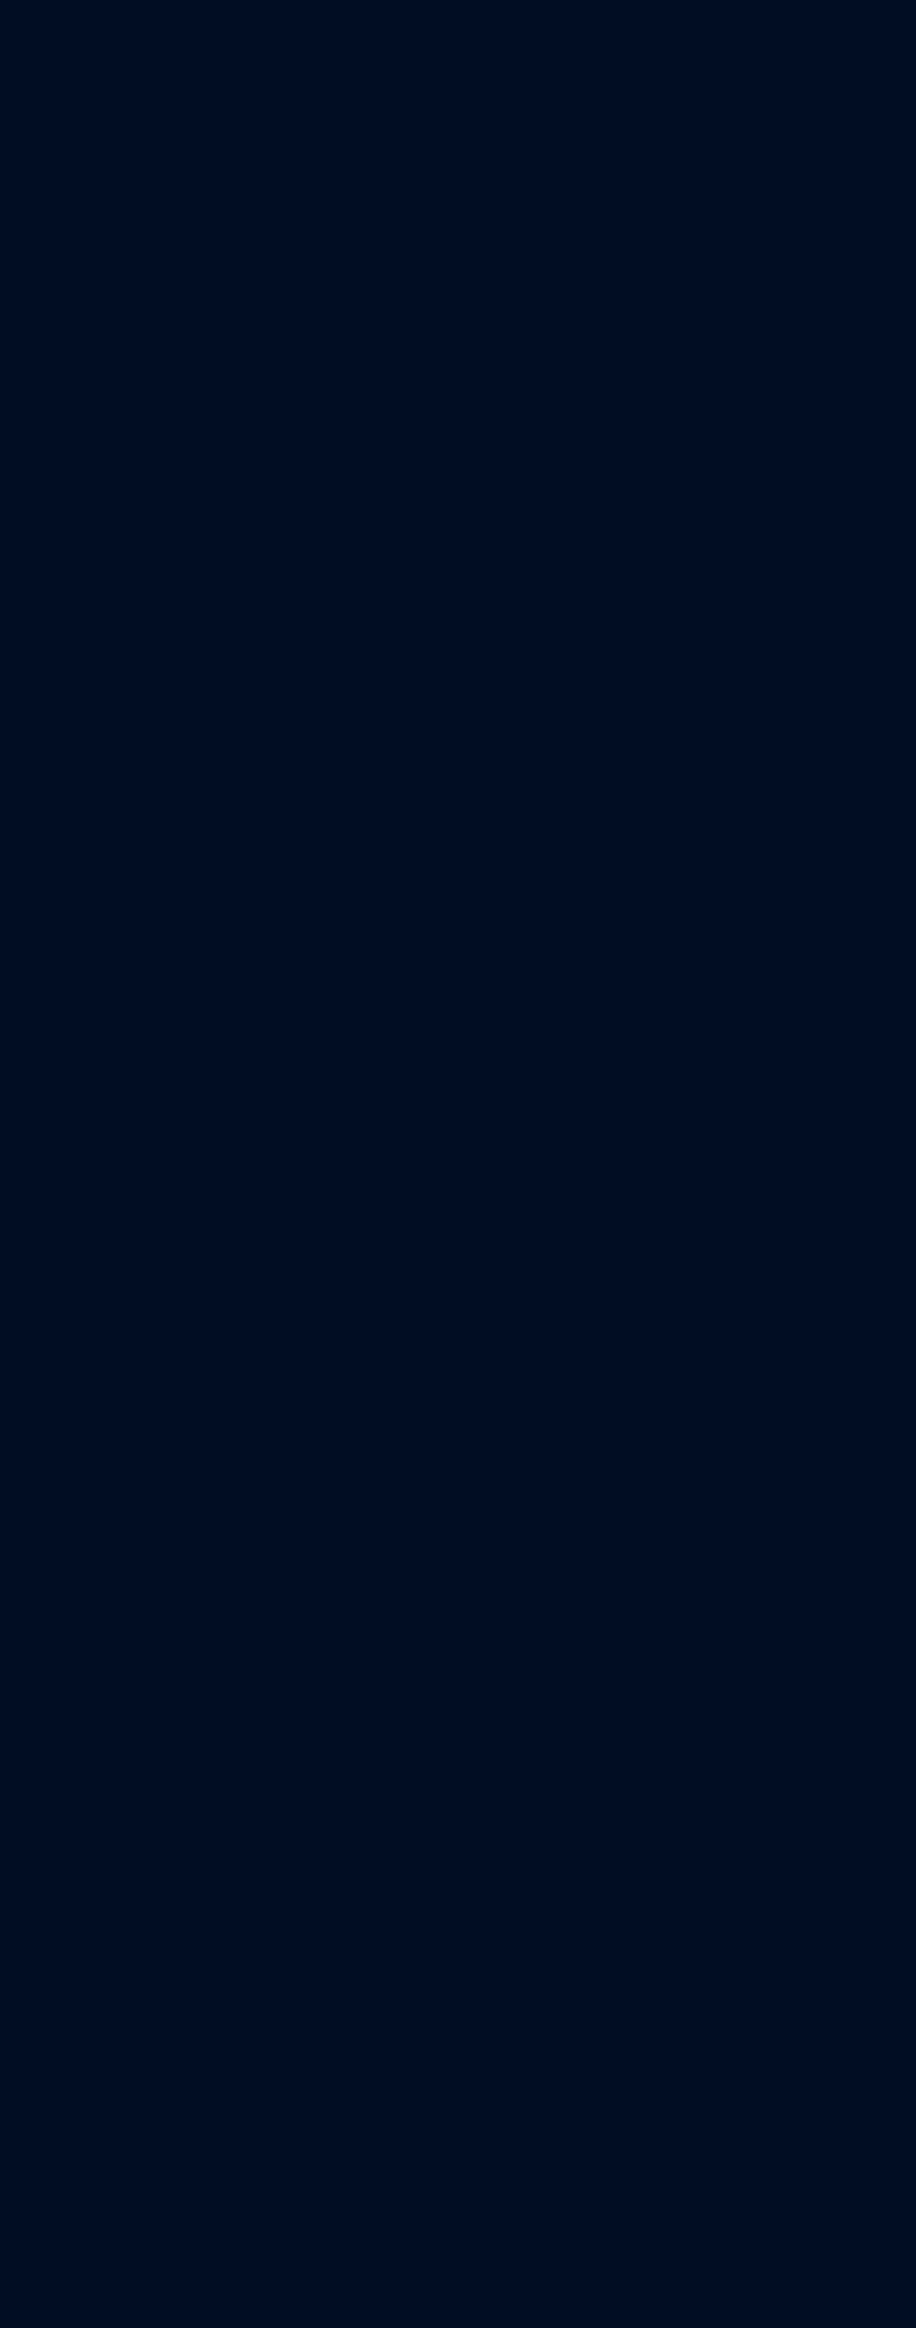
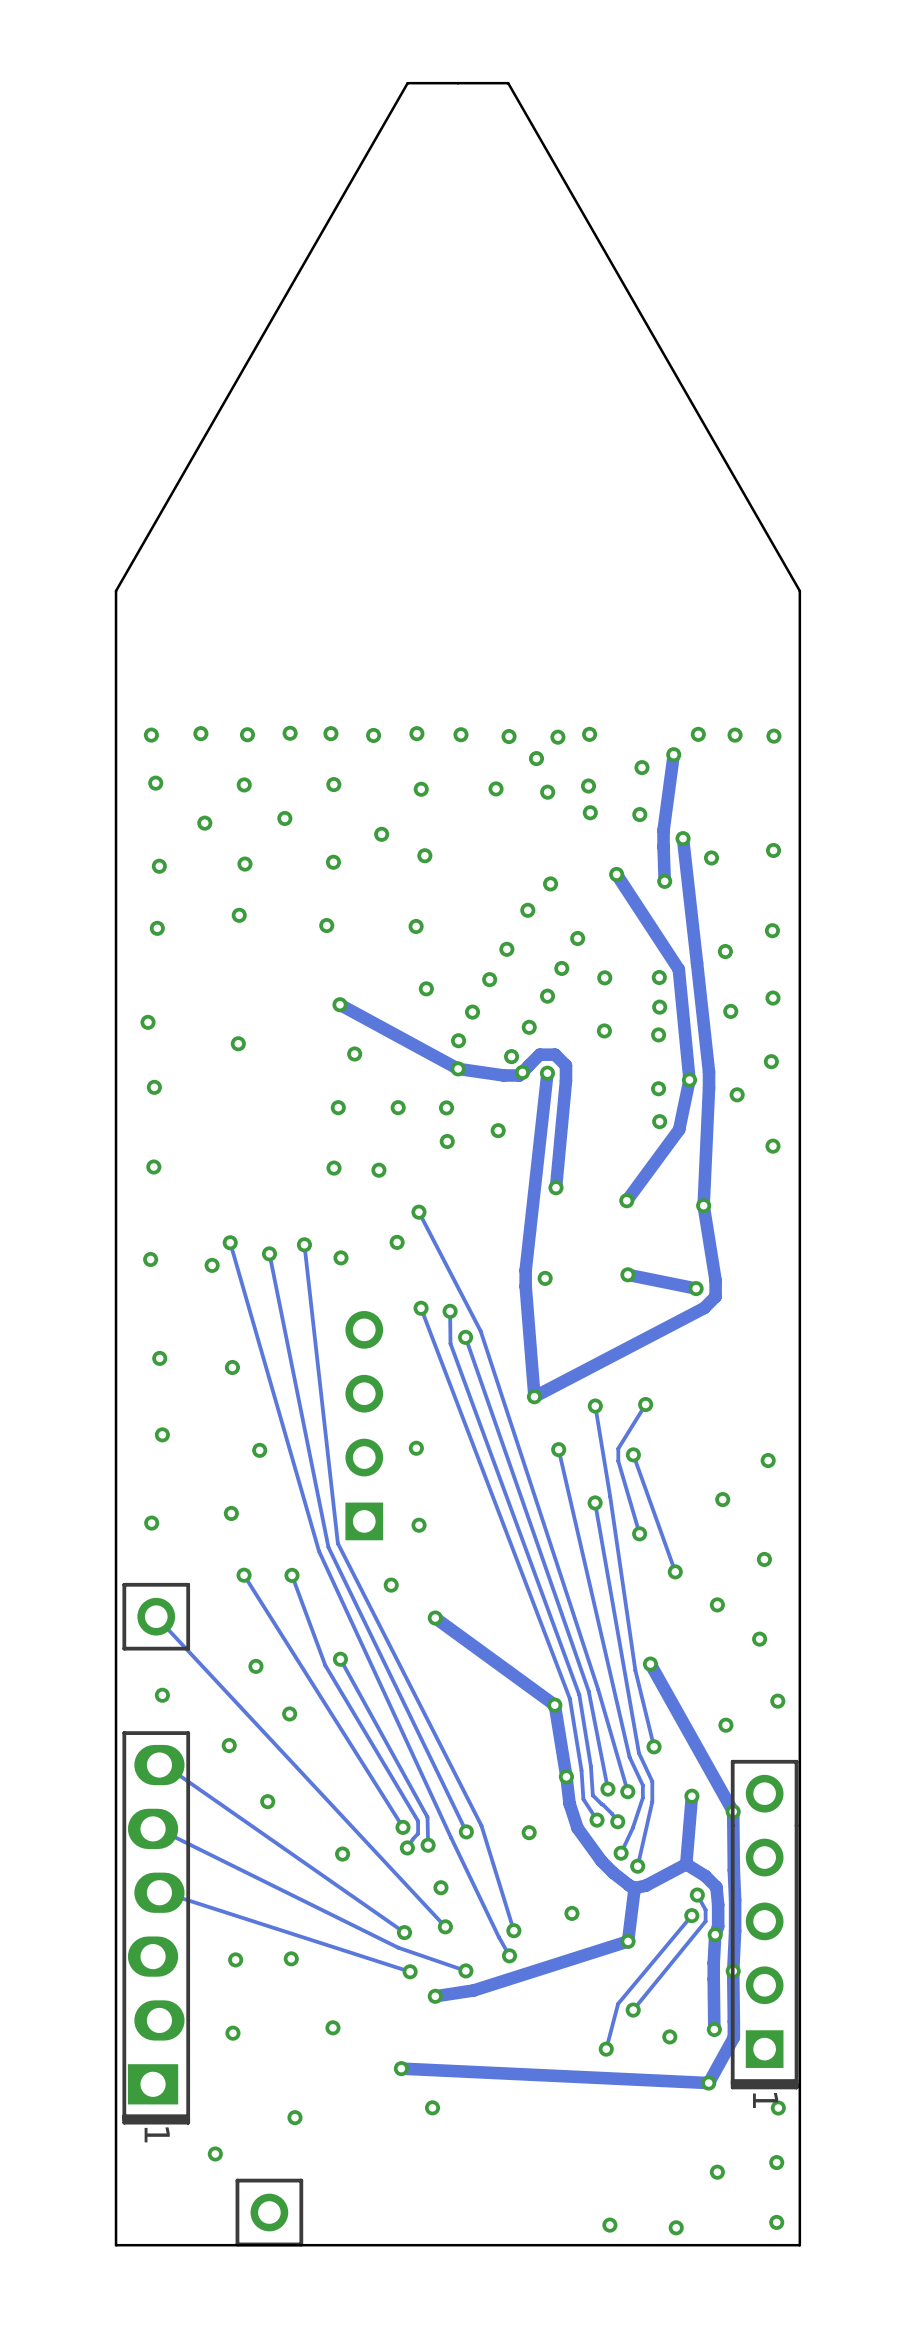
board edge: none -> (508, 83) (799, 591) (799, 2245) (116, 2245) (116, 591) (407, 83) (508, 83)
via: none -> (200, 733)
via: none -> (290, 733)
via: none -> (330, 733)
via: none -> (416, 733)
via: none -> (247, 734)
via: none -> (460, 734)
via: none -> (589, 734)
via: none -> (698, 734)
via: none -> (151, 735)
via: none -> (373, 735)
via: none -> (735, 735)
via: none -> (509, 736)
via: none -> (773, 736)
via: none -> (557, 737)
track: none -> (673, 754) (663, 830) (664, 881)
via: none -> (673, 754)
via: none -> (536, 758)
via: none -> (641, 767)
via: none -> (155, 783)
via: none -> (244, 784)
via: none -> (333, 784)
via: none -> (588, 786)
via: none -> (496, 788)
via: none -> (421, 789)
via: none -> (547, 792)
via: none -> (590, 812)
via: none -> (639, 814)
via: none -> (284, 818)
via: none -> (204, 823)
via: none -> (381, 834)
track: none -> (683, 838) (709, 1071) (703, 1205) (715, 1280) (715, 1296) (704, 1308) (534, 1396) (525, 1270) (547, 1073)
via: none -> (683, 838)
via: none -> (773, 850)
via: none -> (424, 855)
via: none -> (711, 857)
via: none -> (333, 862)
via: none -> (244, 864)
via: none -> (159, 866)
track: none -> (616, 874) (678, 969) (689, 1079) (679, 1129) (626, 1200)
via: none -> (616, 874)
via: none -> (664, 881)
via: none -> (550, 883)
via: none -> (527, 910)
via: none -> (239, 915)
via: none -> (326, 925)
via: none -> (416, 926)
via: none -> (157, 928)
via: none -> (772, 930)
via: none -> (577, 938)
via: none -> (506, 949)
via: none -> (725, 951)
via: none -> (561, 968)
via: none -> (604, 977)
via: none -> (659, 977)
via: none -> (489, 979)
via: none -> (426, 988)
via: none -> (547, 996)
via: none -> (772, 998)
track: none -> (339, 1004) (458, 1068) (503, 1075) (519, 1075) (539, 1054) (555, 1054) (565, 1065) (556, 1187)
via: none -> (339, 1004)
via: none -> (659, 1007)
via: none -> (730, 1011)
via: none -> (472, 1012)
via: none -> (148, 1022)
via: none -> (529, 1027)
via: none -> (604, 1030)
via: none -> (658, 1034)
via: none -> (458, 1040)
via: none -> (238, 1043)
via: none -> (354, 1054)
via: none -> (511, 1056)
via: none -> (771, 1061)
via: none -> (458, 1068)
via: none -> (522, 1072)
via: none -> (547, 1073)
via: none -> (689, 1079)
via: none -> (154, 1087)
via: none -> (658, 1088)
via: none -> (737, 1094)
via: none -> (338, 1107)
via: none -> (398, 1107)
via: none -> (446, 1107)
via: none -> (659, 1121)
via: none -> (498, 1130)
via: none -> (447, 1141)
via: none -> (772, 1146)
via: none -> (153, 1167)
via: none -> (334, 1168)
via: none -> (378, 1170)
via: none -> (556, 1187)
via: none -> (626, 1200)
via: none -> (703, 1205)
track: none -> (418, 1212) (480, 1331) (598, 1689) (627, 1791)
via: none -> (418, 1212)
track: none -> (230, 1242) (319, 1551) (451, 1838) (509, 1955)
via: none -> (230, 1242)
via: none -> (397, 1242)
track: none -> (304, 1244) (337, 1543) (481, 1825) (513, 1930)
via: none -> (304, 1244)
track: none -> (269, 1253) (328, 1547) (466, 1831)
via: none -> (269, 1253)
via: none -> (340, 1257)
via: none -> (150, 1259)
via: none -> (212, 1265)
track: none -> (627, 1274) (696, 1288)
via: none -> (627, 1274)
via: none -> (545, 1278)
via: none -> (696, 1288)
track: none -> (421, 1308) (569, 1698) (581, 1770) (583, 1799) (597, 1820)
via: none -> (421, 1308)
track: none -> (450, 1311) (450, 1343) (579, 1694) (590, 1766) (592, 1795) (617, 1821)
via: none -> (450, 1311)
track: none -> (465, 1337) (588, 1691) (607, 1789)
via: none -> (465, 1337)
via: none -> (159, 1358)
via: none -> (232, 1367)
via: none -> (534, 1396)
track: none -> (645, 1404) (618, 1448) (618, 1461) (639, 1533)
via: none -> (645, 1404)
track: none -> (595, 1406) (635, 1670) (654, 1746)
via: none -> (595, 1406)
part: none -> (364, 1425)
via: none -> (162, 1434)
via: none -> (416, 1448)
track: none -> (558, 1449) (629, 1757) (642, 1785) (642, 1797) (632, 1827) (621, 1853)
via: none -> (558, 1449)
via: none -> (259, 1450)
track: none -> (633, 1454) (675, 1571)
via: none -> (633, 1454)
via: none -> (768, 1460)
via: none -> (722, 1499)
track: none -> (595, 1502) (638, 1753) (652, 1781) (652, 1801) (637, 1866)
via: none -> (595, 1502)
via: none -> (231, 1513)
via: none -> (151, 1523)
via: none -> (419, 1525)
via: none -> (639, 1533)
via: none -> (764, 1559)
via: none -> (675, 1571)
track: none -> (244, 1575) (403, 1827)
via: none -> (244, 1575)
track: none -> (291, 1575) (325, 1665) (418, 1821) (418, 1833) (407, 1847)
via: none -> (291, 1575)
via: none -> (391, 1585)
via: none -> (717, 1604)
track: none -> (156, 1616) (445, 1926)
part: none -> (156, 1616)
track: none -> (435, 1618) (554, 1705) (569, 1803) (577, 1828) (601, 1861) (613, 1872) (634, 1888)
via: none -> (435, 1618)
via: none -> (759, 1639)
track: none -> (340, 1659) (427, 1817) (428, 1845)
via: none -> (340, 1659)
track: none -> (650, 1664) (733, 1811) (735, 1900) (733, 2037) (708, 2083) (401, 2068)
via: none -> (650, 1664)
via: none -> (255, 1666)
via: none -> (162, 1695)
via: none -> (777, 1701)
via: none -> (554, 1705)
via: none -> (289, 1713)
via: none -> (725, 1725)
via: none -> (229, 1745)
via: none -> (654, 1746)
track: none -> (159, 1765) (164, 1765) (404, 1932)
via: none -> (566, 1776)
via: none -> (607, 1789)
via: none -> (627, 1791)
track: none -> (691, 1796) (686, 1864)
via: none -> (691, 1796)
via: none -> (267, 1801)
via: none -> (733, 1811)
via: none -> (597, 1820)
via: none -> (617, 1821)
via: none -> (403, 1827)
track: none -> (153, 1828) (158, 1828) (398, 1947) (465, 1970)
via: none -> (466, 1831)
via: none -> (529, 1832)
via: none -> (428, 1845)
via: none -> (407, 1847)
via: none -> (621, 1853)
via: none -> (342, 1854)
track: none -> (686, 1864) (705, 1875) (716, 1887) (718, 1926) (715, 1934) (713, 1963) (714, 2029)
track: none -> (686, 1864) (645, 1885) (634, 1888)
via: none -> (637, 1866)
via: none -> (440, 1887)
track: none -> (634, 1888) (628, 1941) (473, 1990) (435, 1996)
track: none -> (159, 1892) (164, 1892) (410, 1971)
track: none -> (697, 1895) (705, 1909) (705, 1921) (633, 2010)
via: none -> (697, 1895)
via: none -> (571, 1913)
track: none -> (691, 1915) (618, 2003) (606, 2049)
via: none -> (691, 1915)
part: none -> (764, 1924)
via: none -> (445, 1926)
part: none -> (156, 1927)
via: none -> (513, 1930)
via: none -> (404, 1932)
via: none -> (715, 1934)
via: none -> (628, 1941)
via: none -> (509, 1955)
via: none -> (291, 1958)
via: none -> (235, 1959)
via: none -> (465, 1970)
via: none -> (410, 1971)
via: none -> (733, 1971)
via: none -> (435, 1996)
via: none -> (633, 2010)
via: none -> (332, 2027)
via: none -> (714, 2029)
via: none -> (232, 2033)
via: none -> (669, 2036)
via: none -> (606, 2049)
via: none -> (401, 2068)
via: none -> (708, 2083)
via: none -> (432, 2107)
via: none -> (778, 2108)
via: none -> (294, 2117)
via: none -> (215, 2154)
via: none -> (776, 2162)
via: none -> (717, 2172)
part: none -> (269, 2212)
via: none -> (776, 2222)
via: none -> (609, 2225)
via: none -> (676, 2227)

